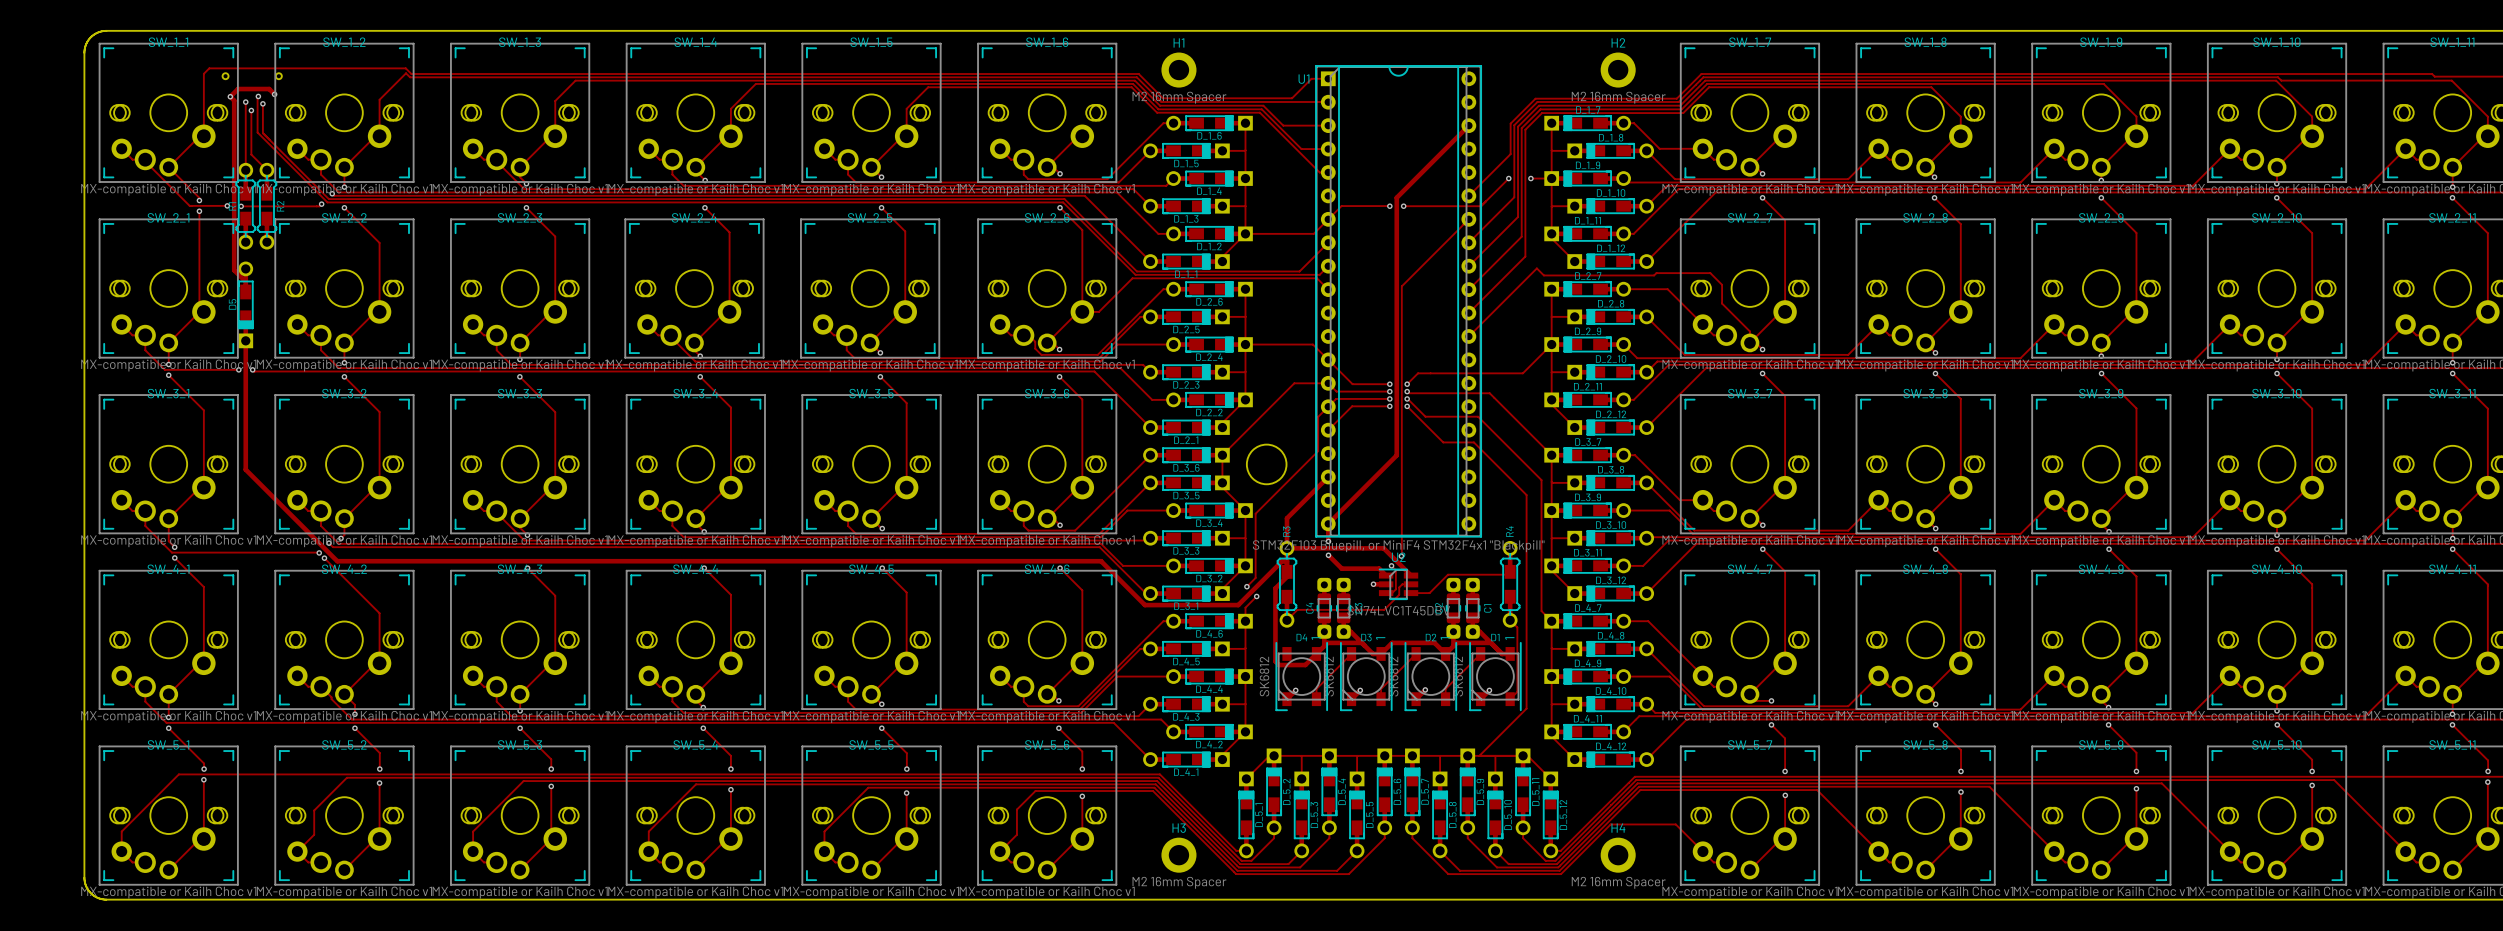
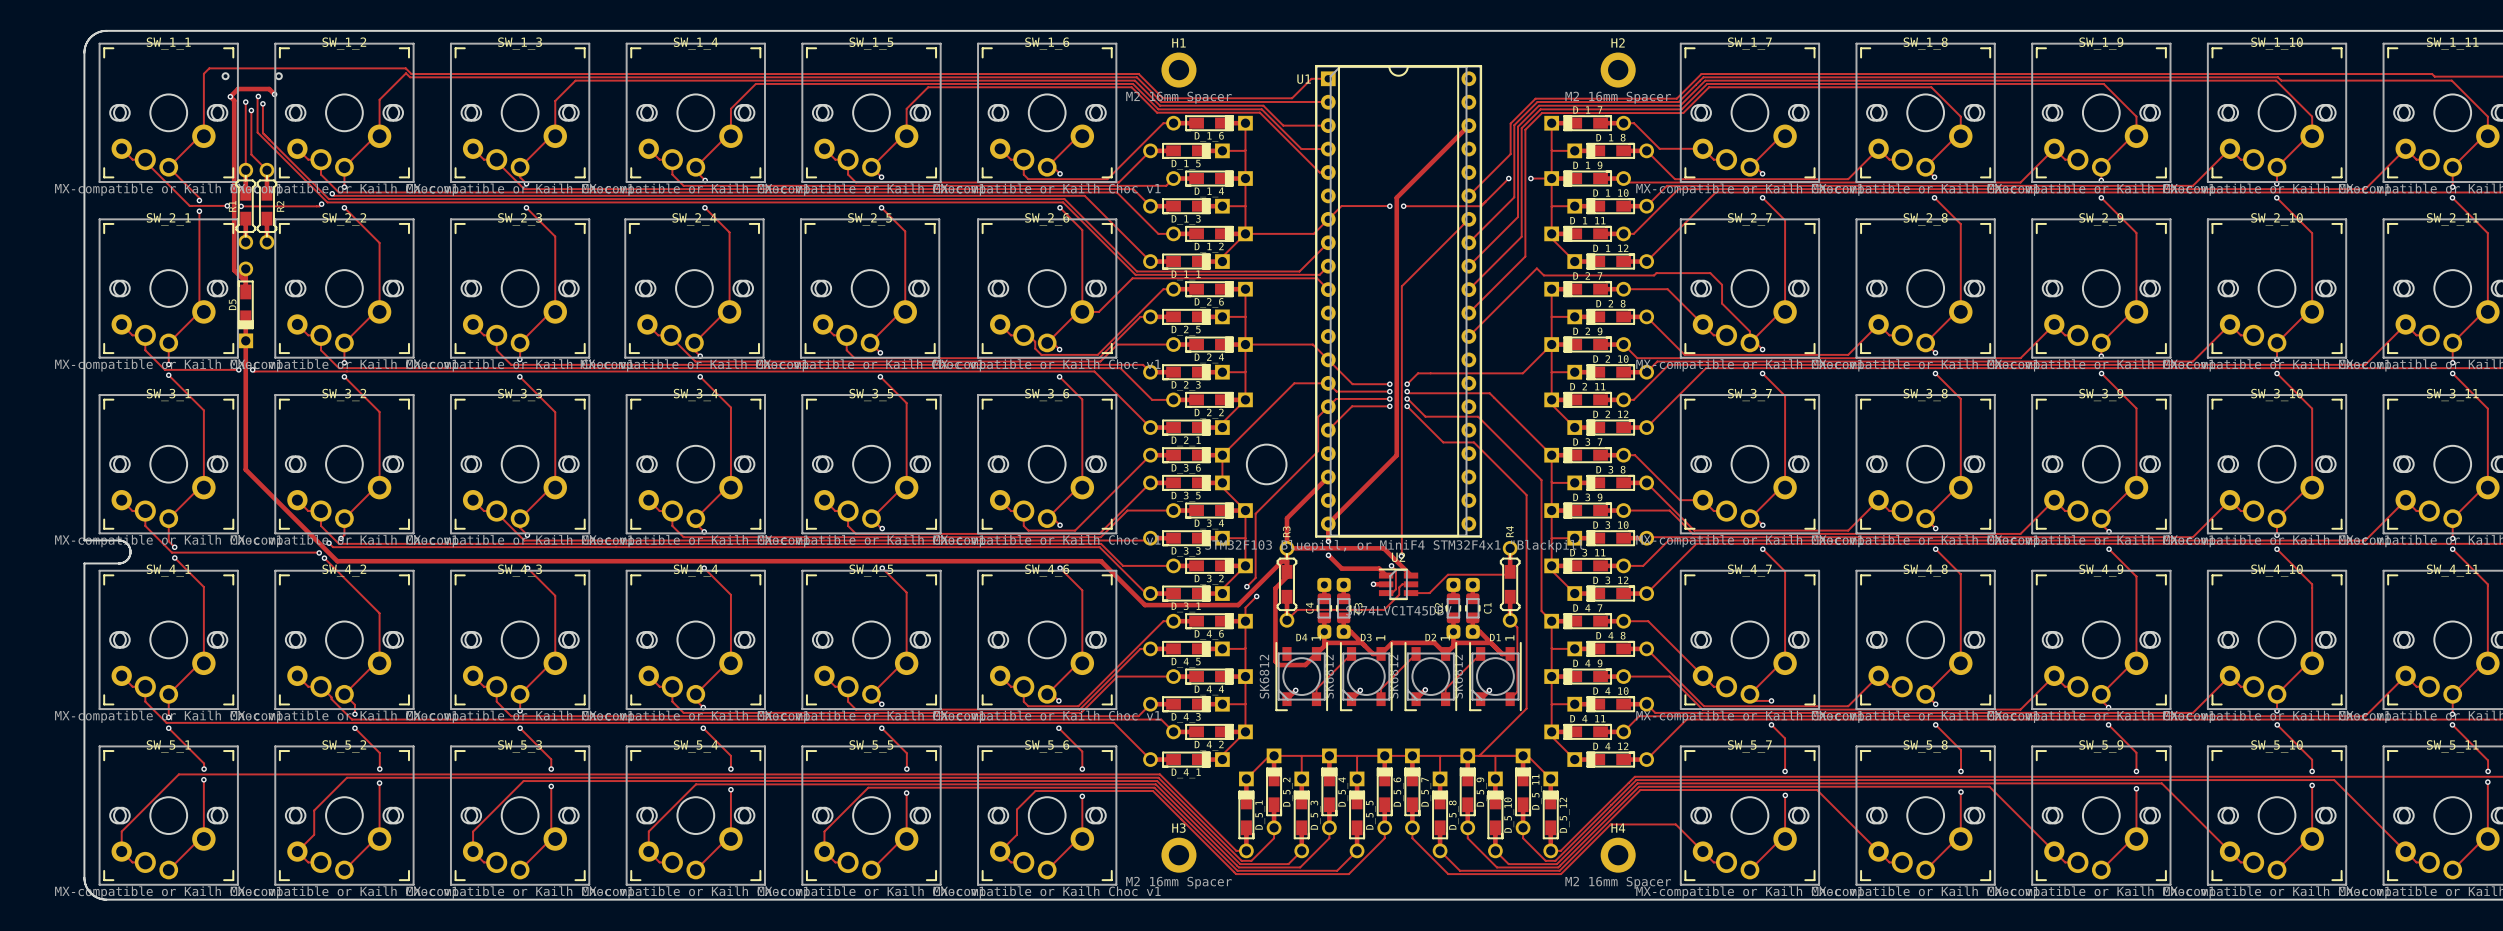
board edge: (84, 540) (84, 563) -> (84, 540) (119, 540) (125, 542) (129, 548) (130, 555) (125, 561) (118, 563)
board edge: none -> (84, 563) (118, 563)

